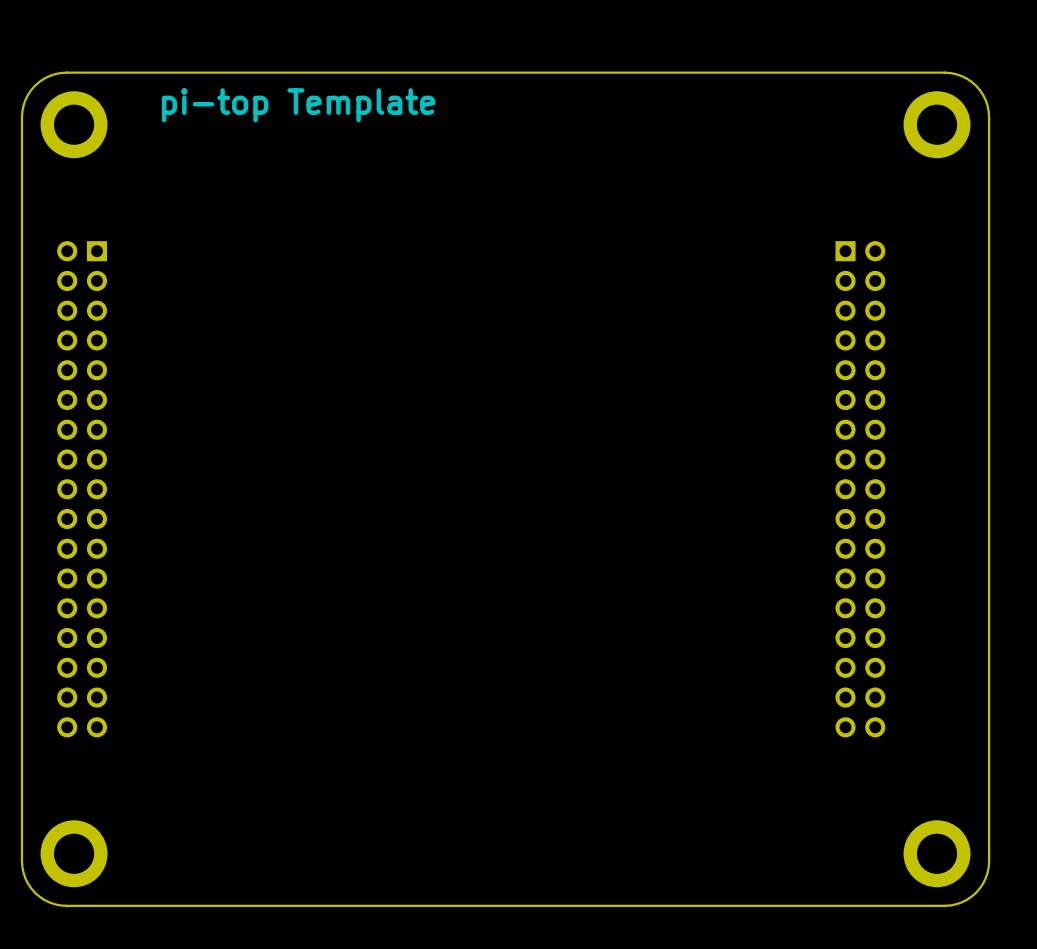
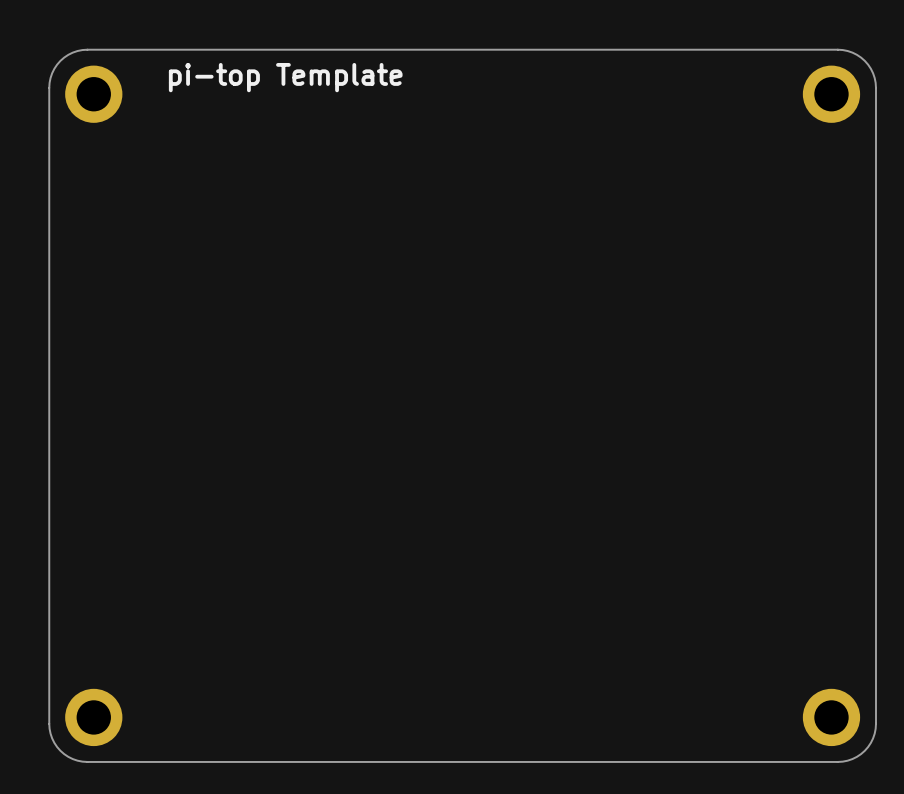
part: (82, 489) -> none
part: (860, 489) -> none

